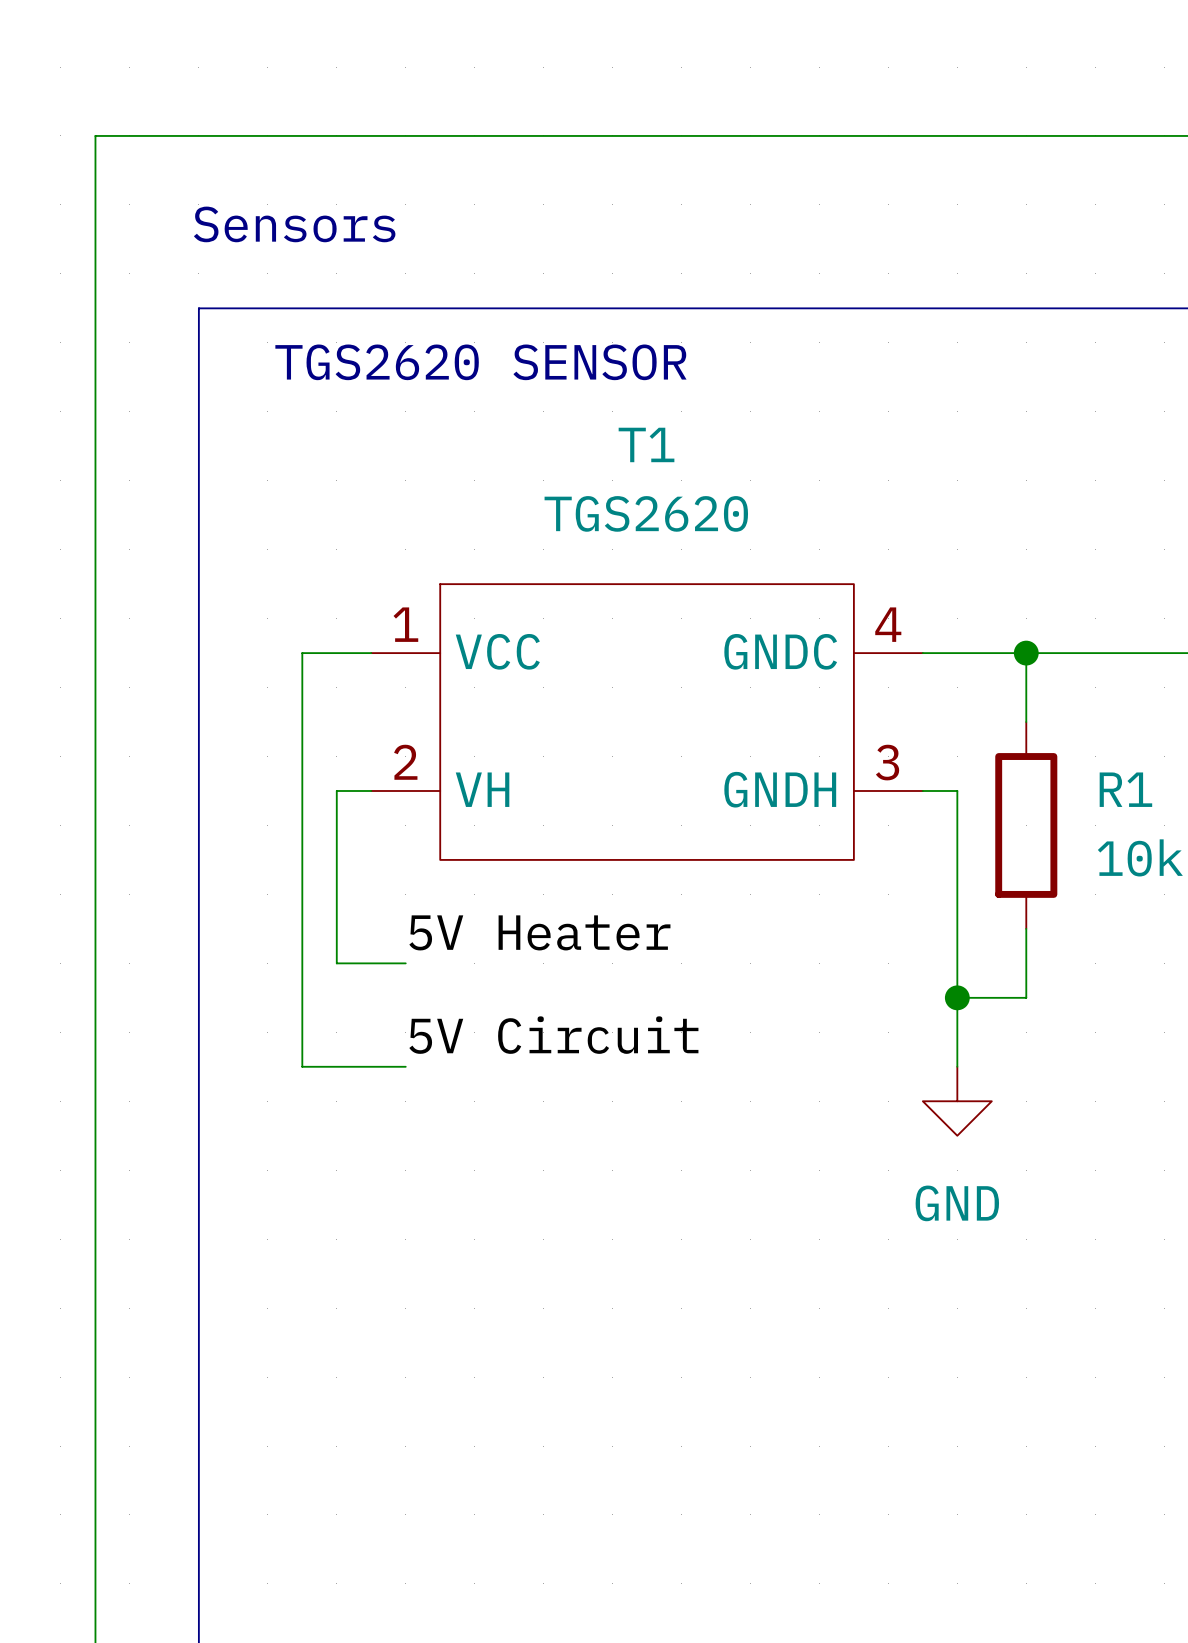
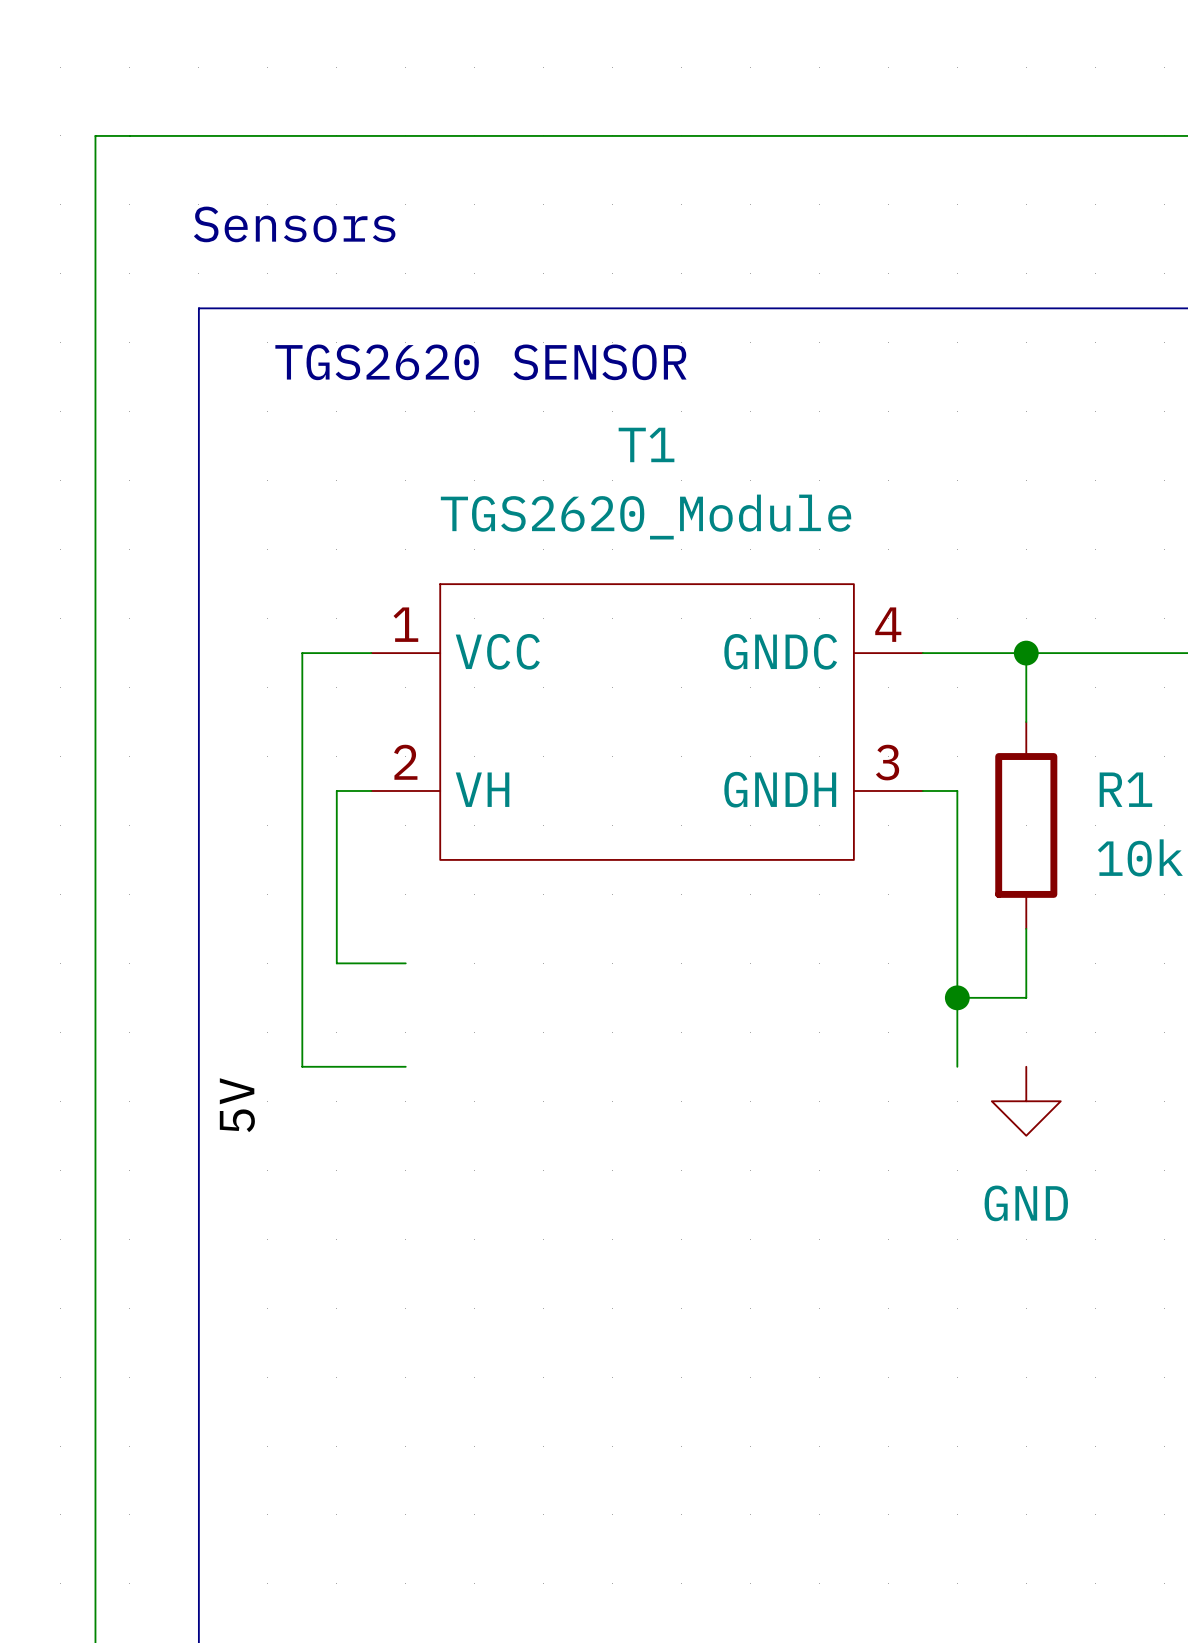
T1 value: TGS2620 (646, 513) -> TGS2620_Module (646, 517)
label: 5V Heater (539, 932) -> none
label: 5V Circuit (553, 1035) -> none
power symbol position: GND (957, 1101) -> GND (1026, 1101)
label: none -> 5V (237, 1105)

